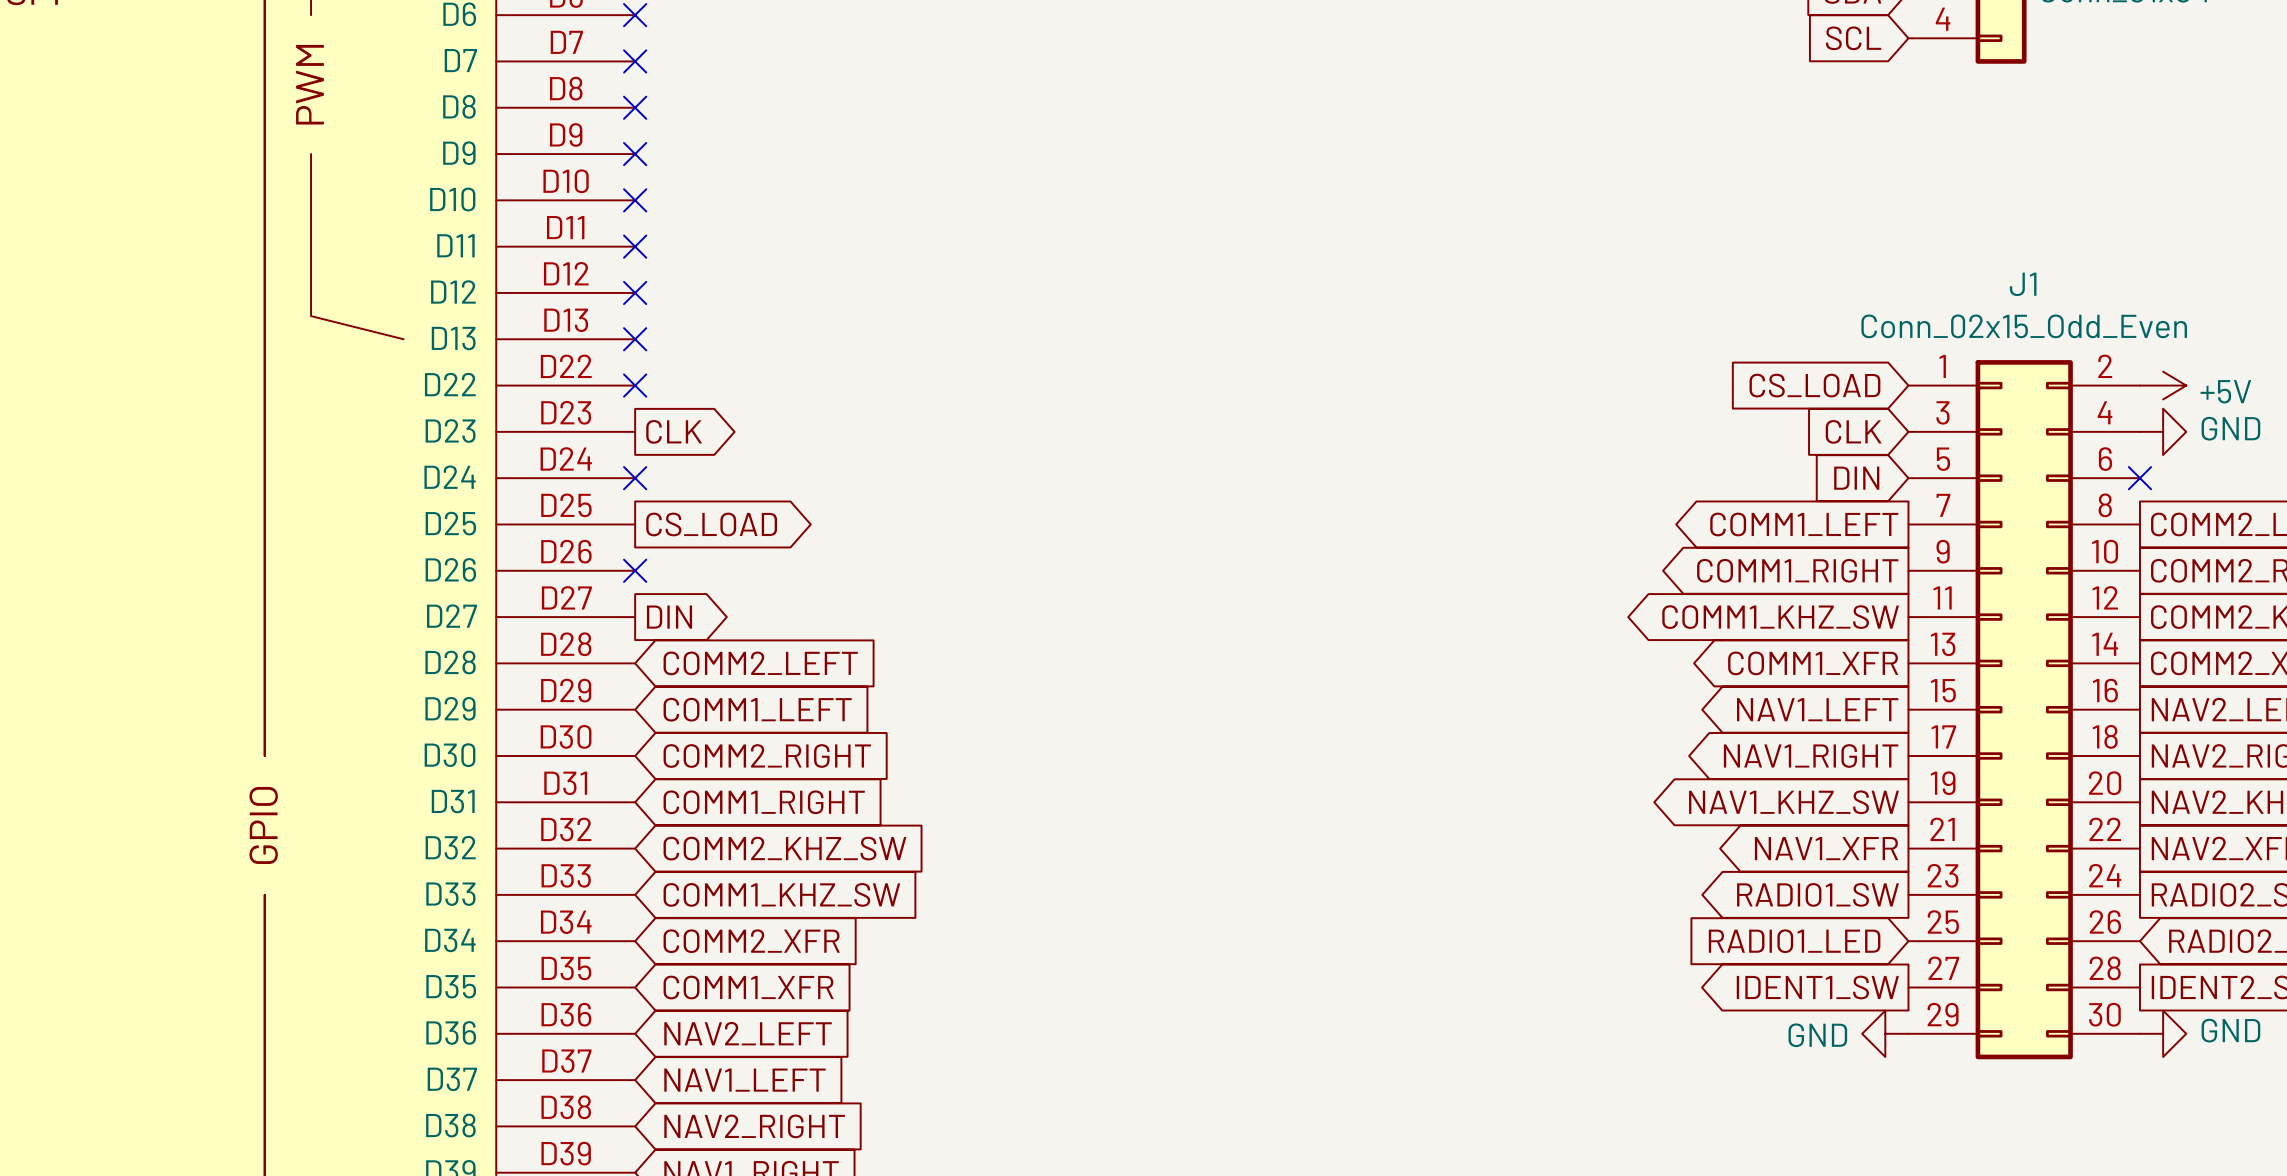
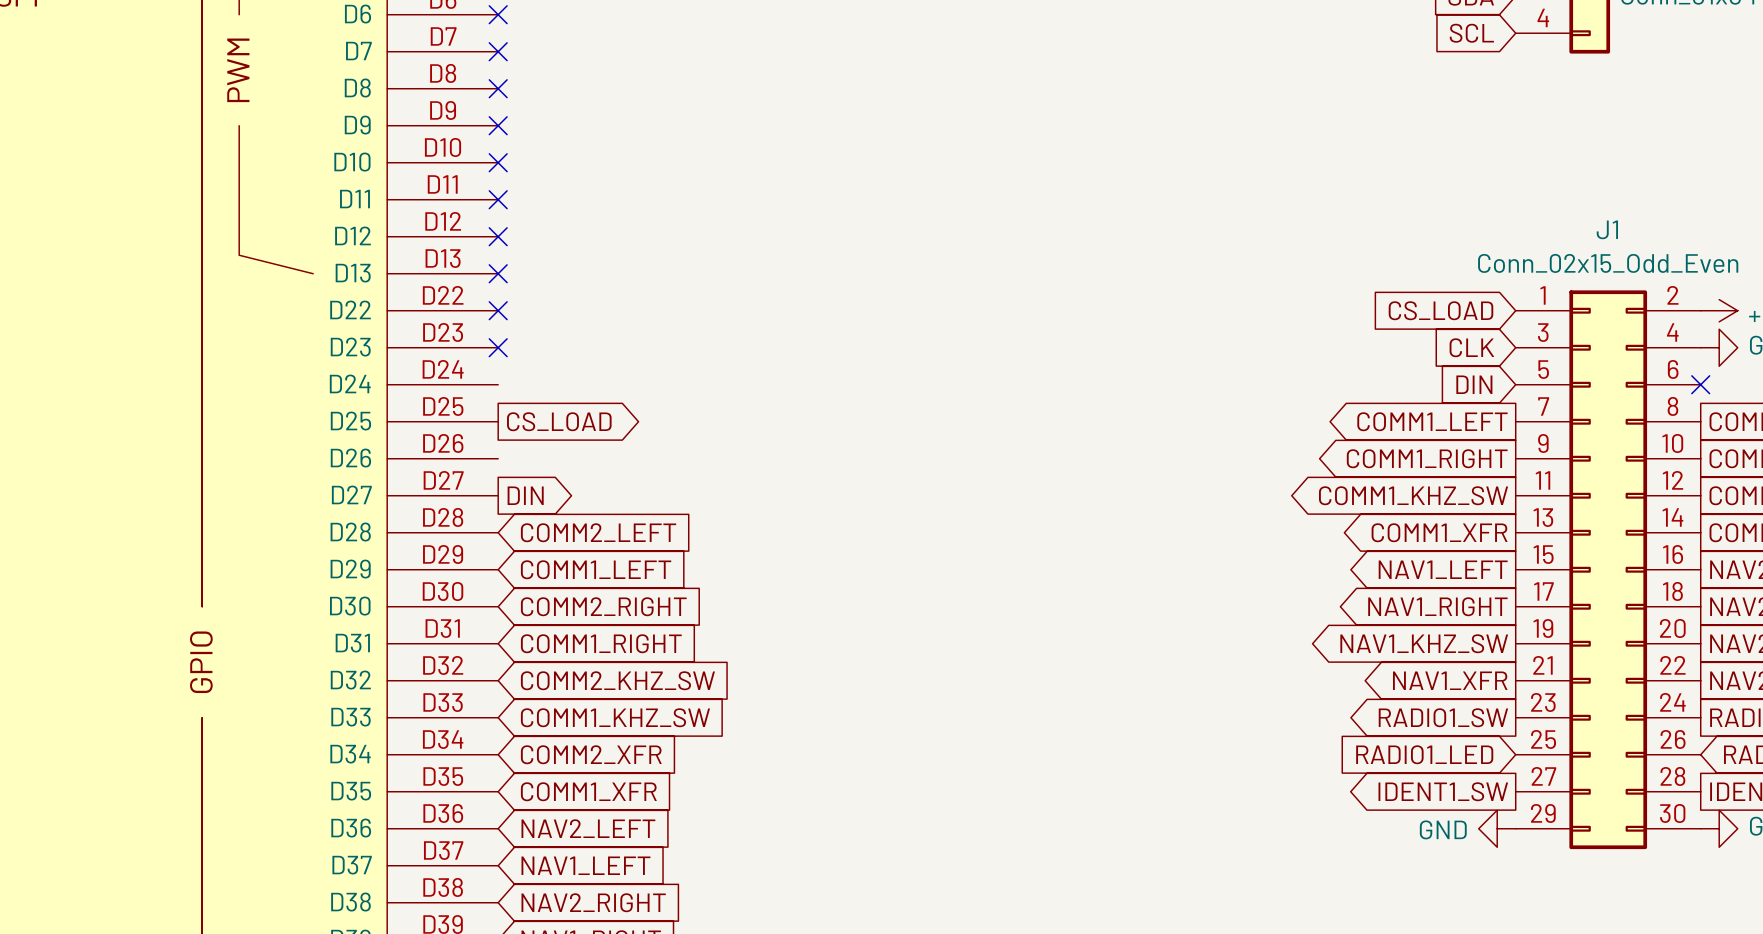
global label: CLK (674, 431) -> none
no-connect mark position: (635, 478) -> (498, 347)
no-connect mark: (635, 570) -> none

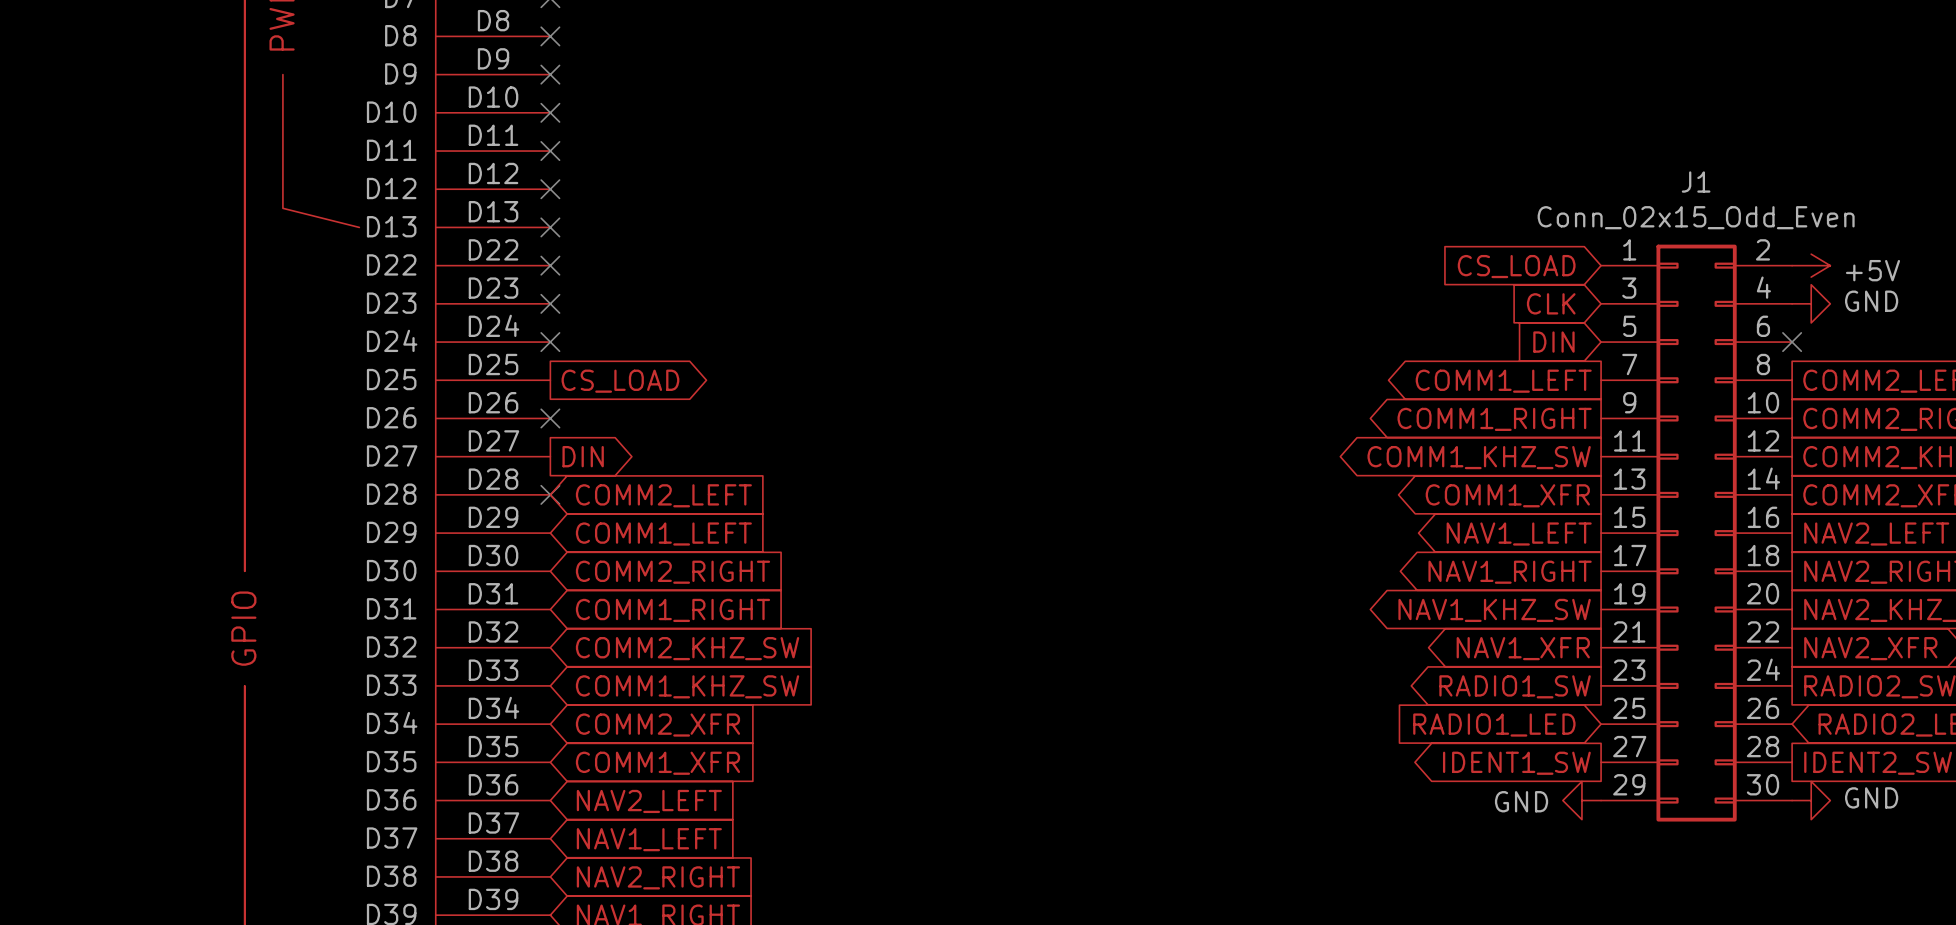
no-connect mark: none -> (550, 342)
no-connect mark: none -> (550, 418)
no-connect mark: none -> (550, 494)

